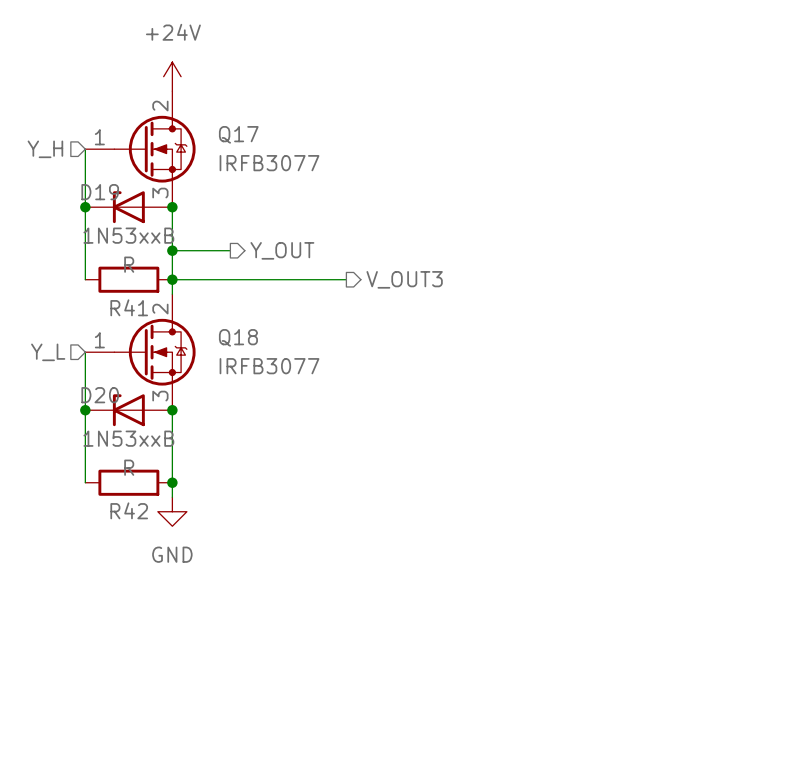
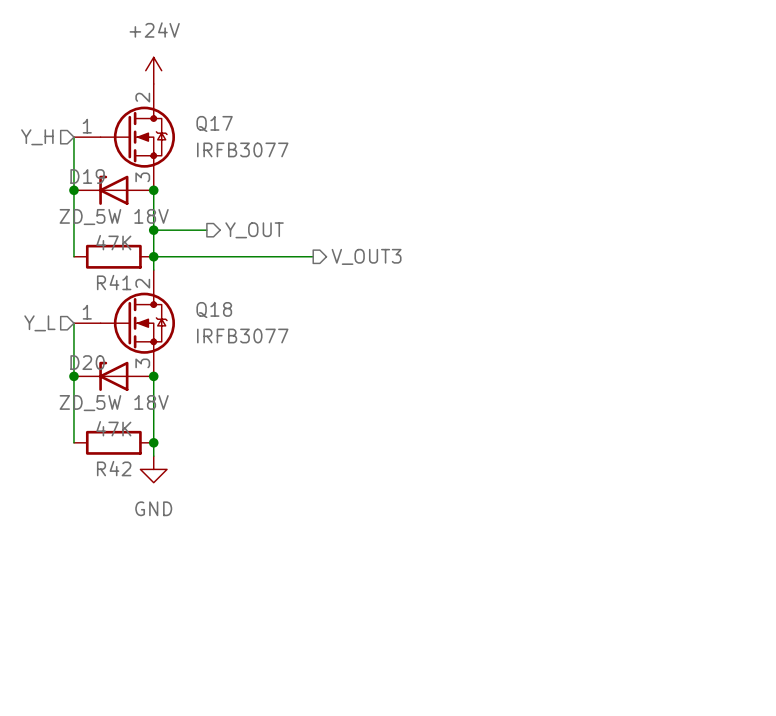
D19 value: 1N53xxB (128, 235) -> ZD_5W 18V (114, 217)
R41 value: R (129, 264) -> 47K (113, 242)
D20 value: 1N53xxB (128, 438) -> ZD_5W 18V (114, 403)
R42 value: R (129, 467) -> 47K (113, 428)

